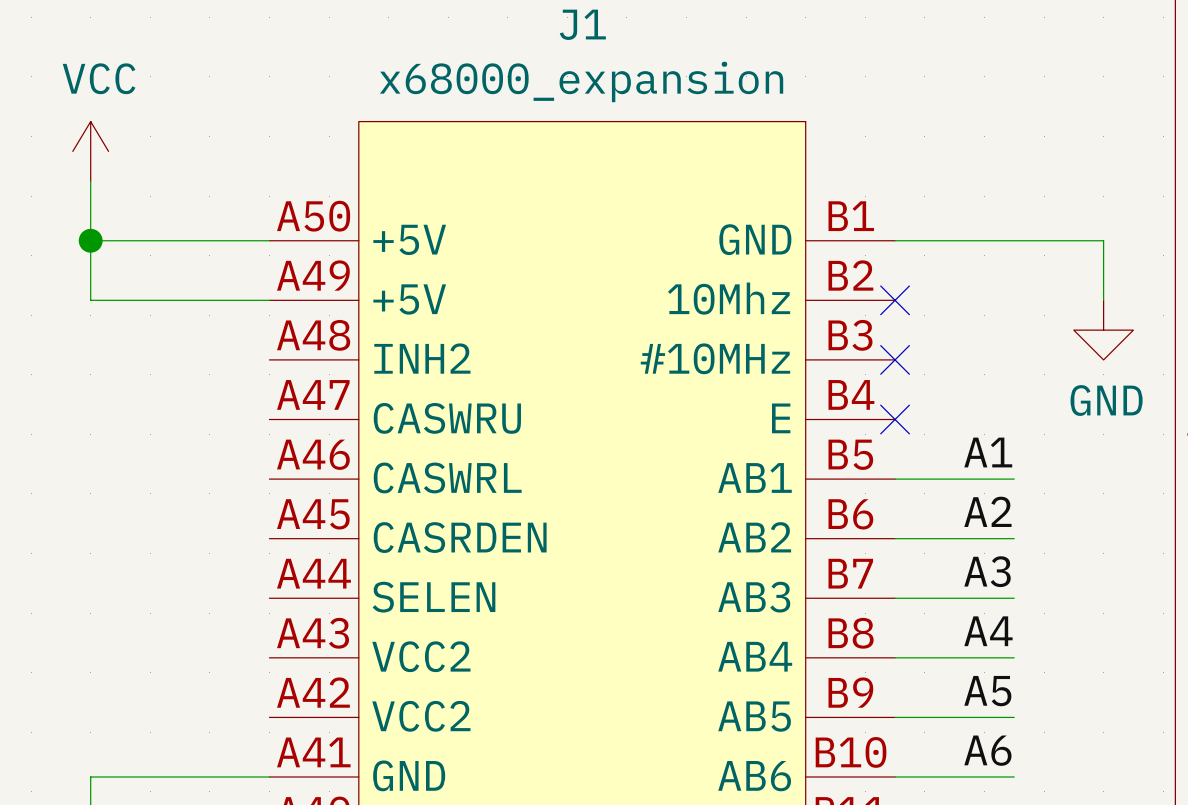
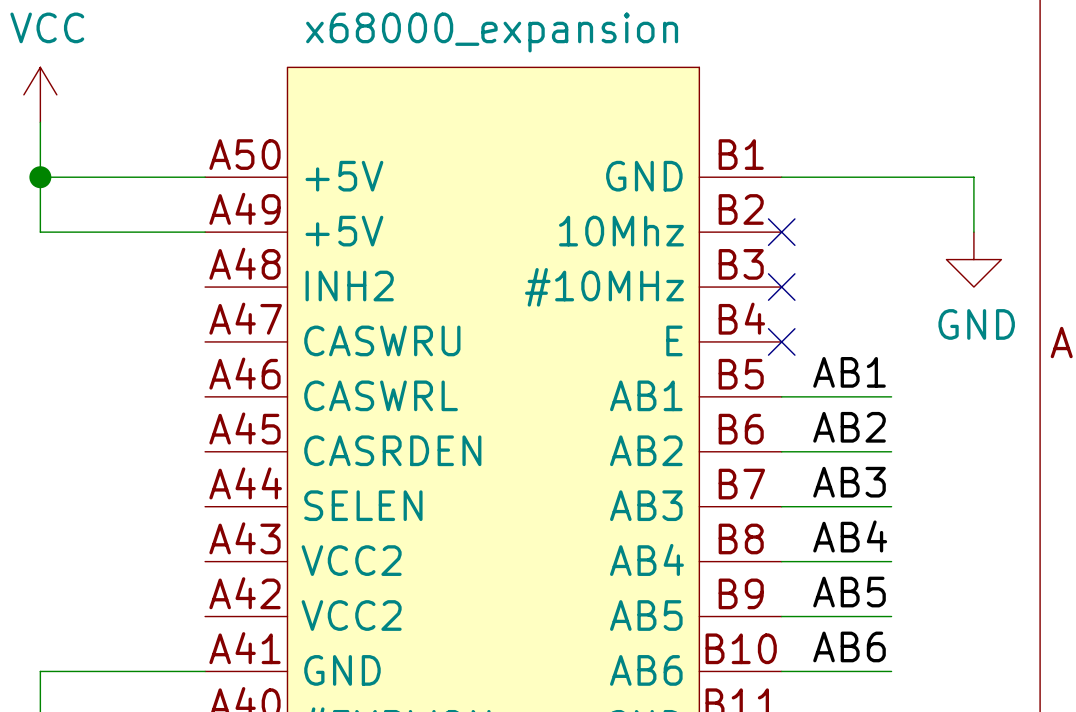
label: A1 (988, 452) -> AB1 (849, 372)
label: A2 (987, 511) -> AB2 (849, 427)
label: A3 (987, 571) -> AB3 (849, 482)
label: A4 (988, 631) -> AB4 (850, 536)
label: A5 (987, 691) -> AB5 (849, 592)
label: A6 (987, 750) -> AB6 (849, 646)

